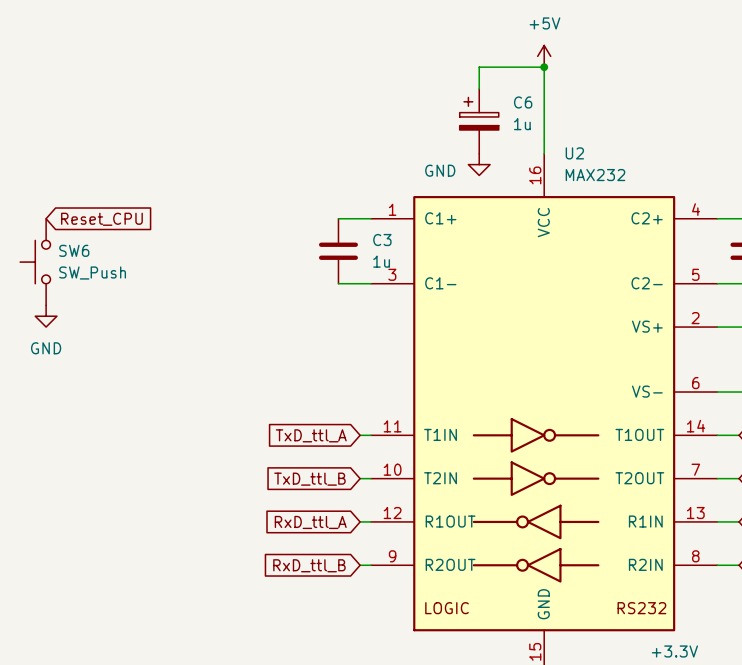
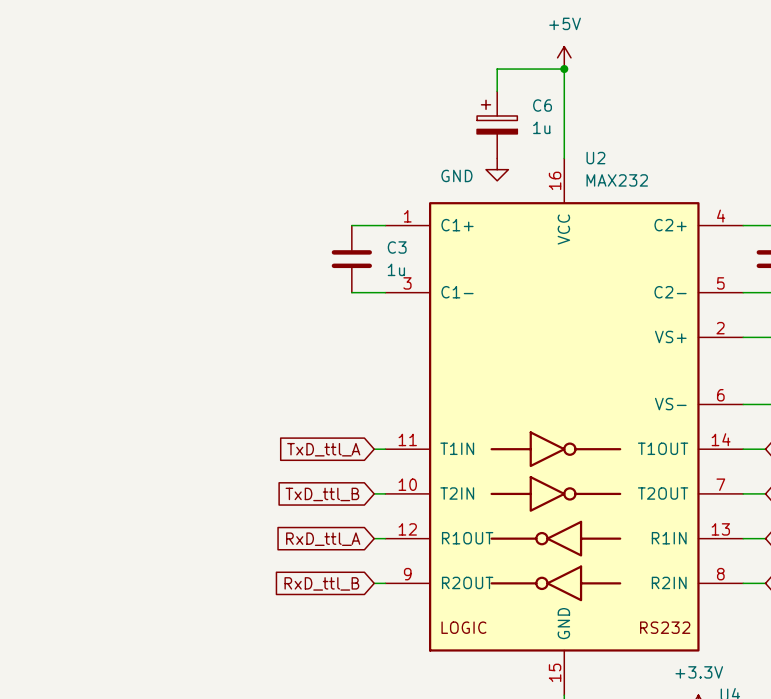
global label: Reset_CPU (101, 219) -> none
SW6: SW_Push (35, 262) -> none
power symbol: GND (46, 316) -> none

